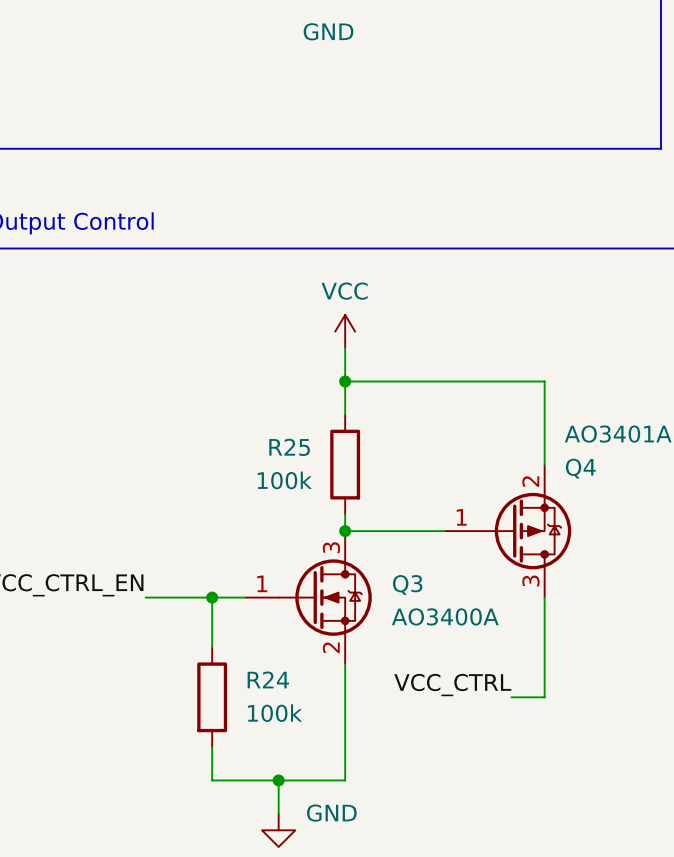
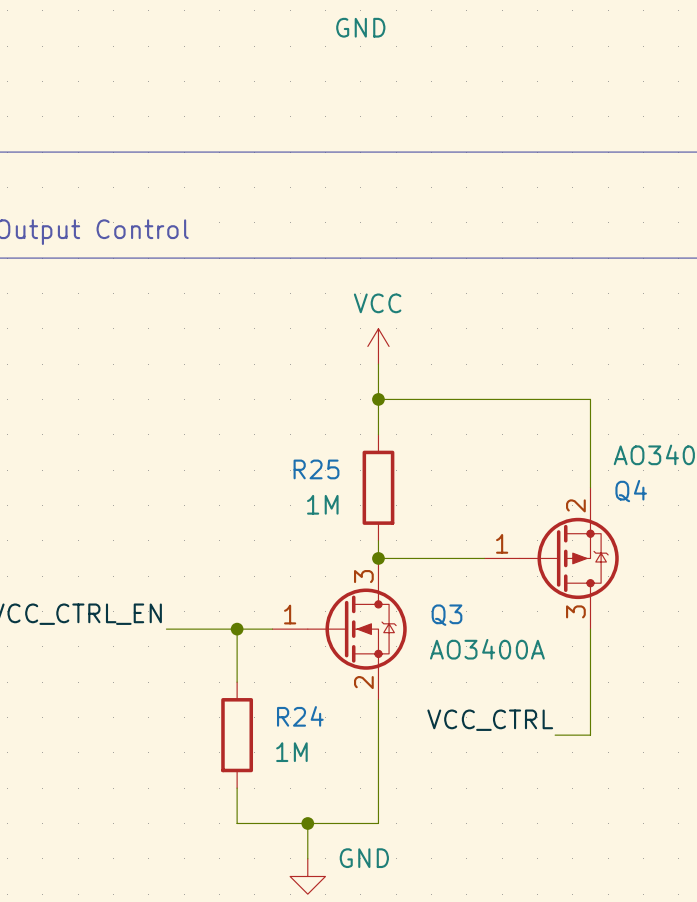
R25 value: 100k (284, 480) -> 1M (322, 504)
R24 value: 100k (275, 713) -> 1M (291, 752)

